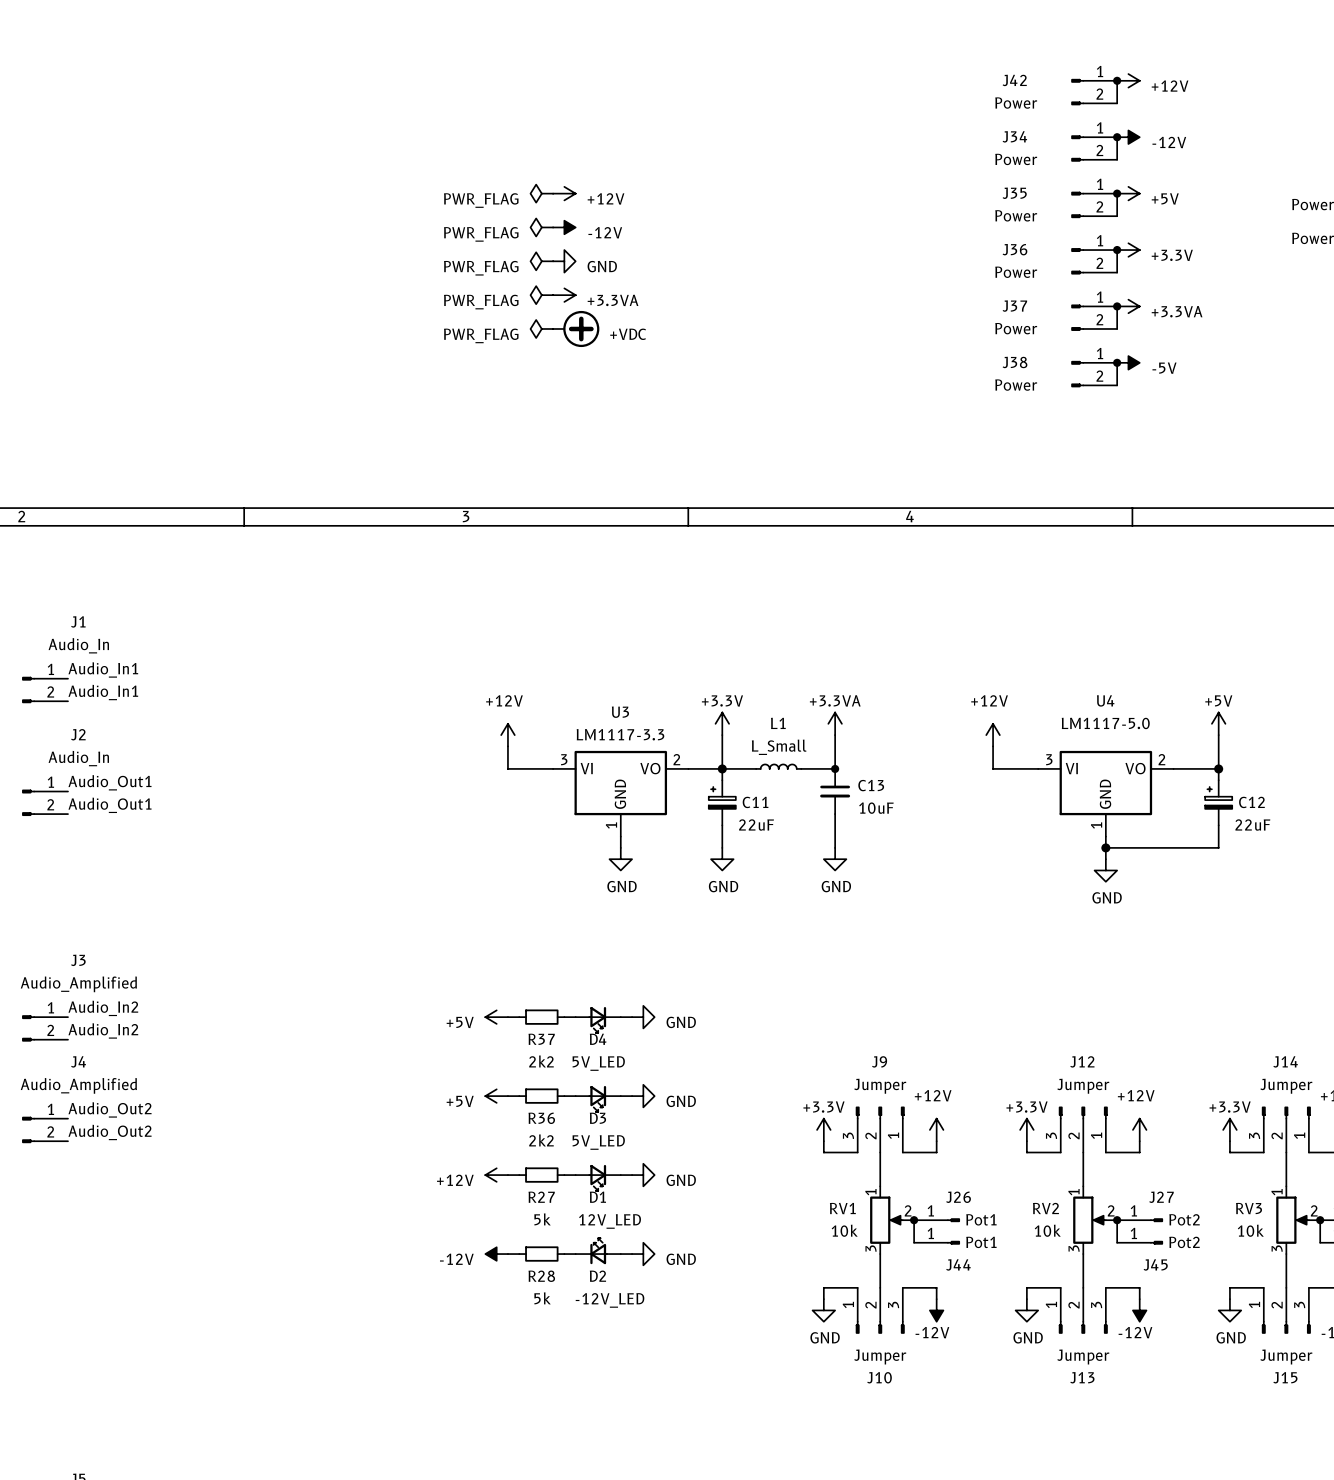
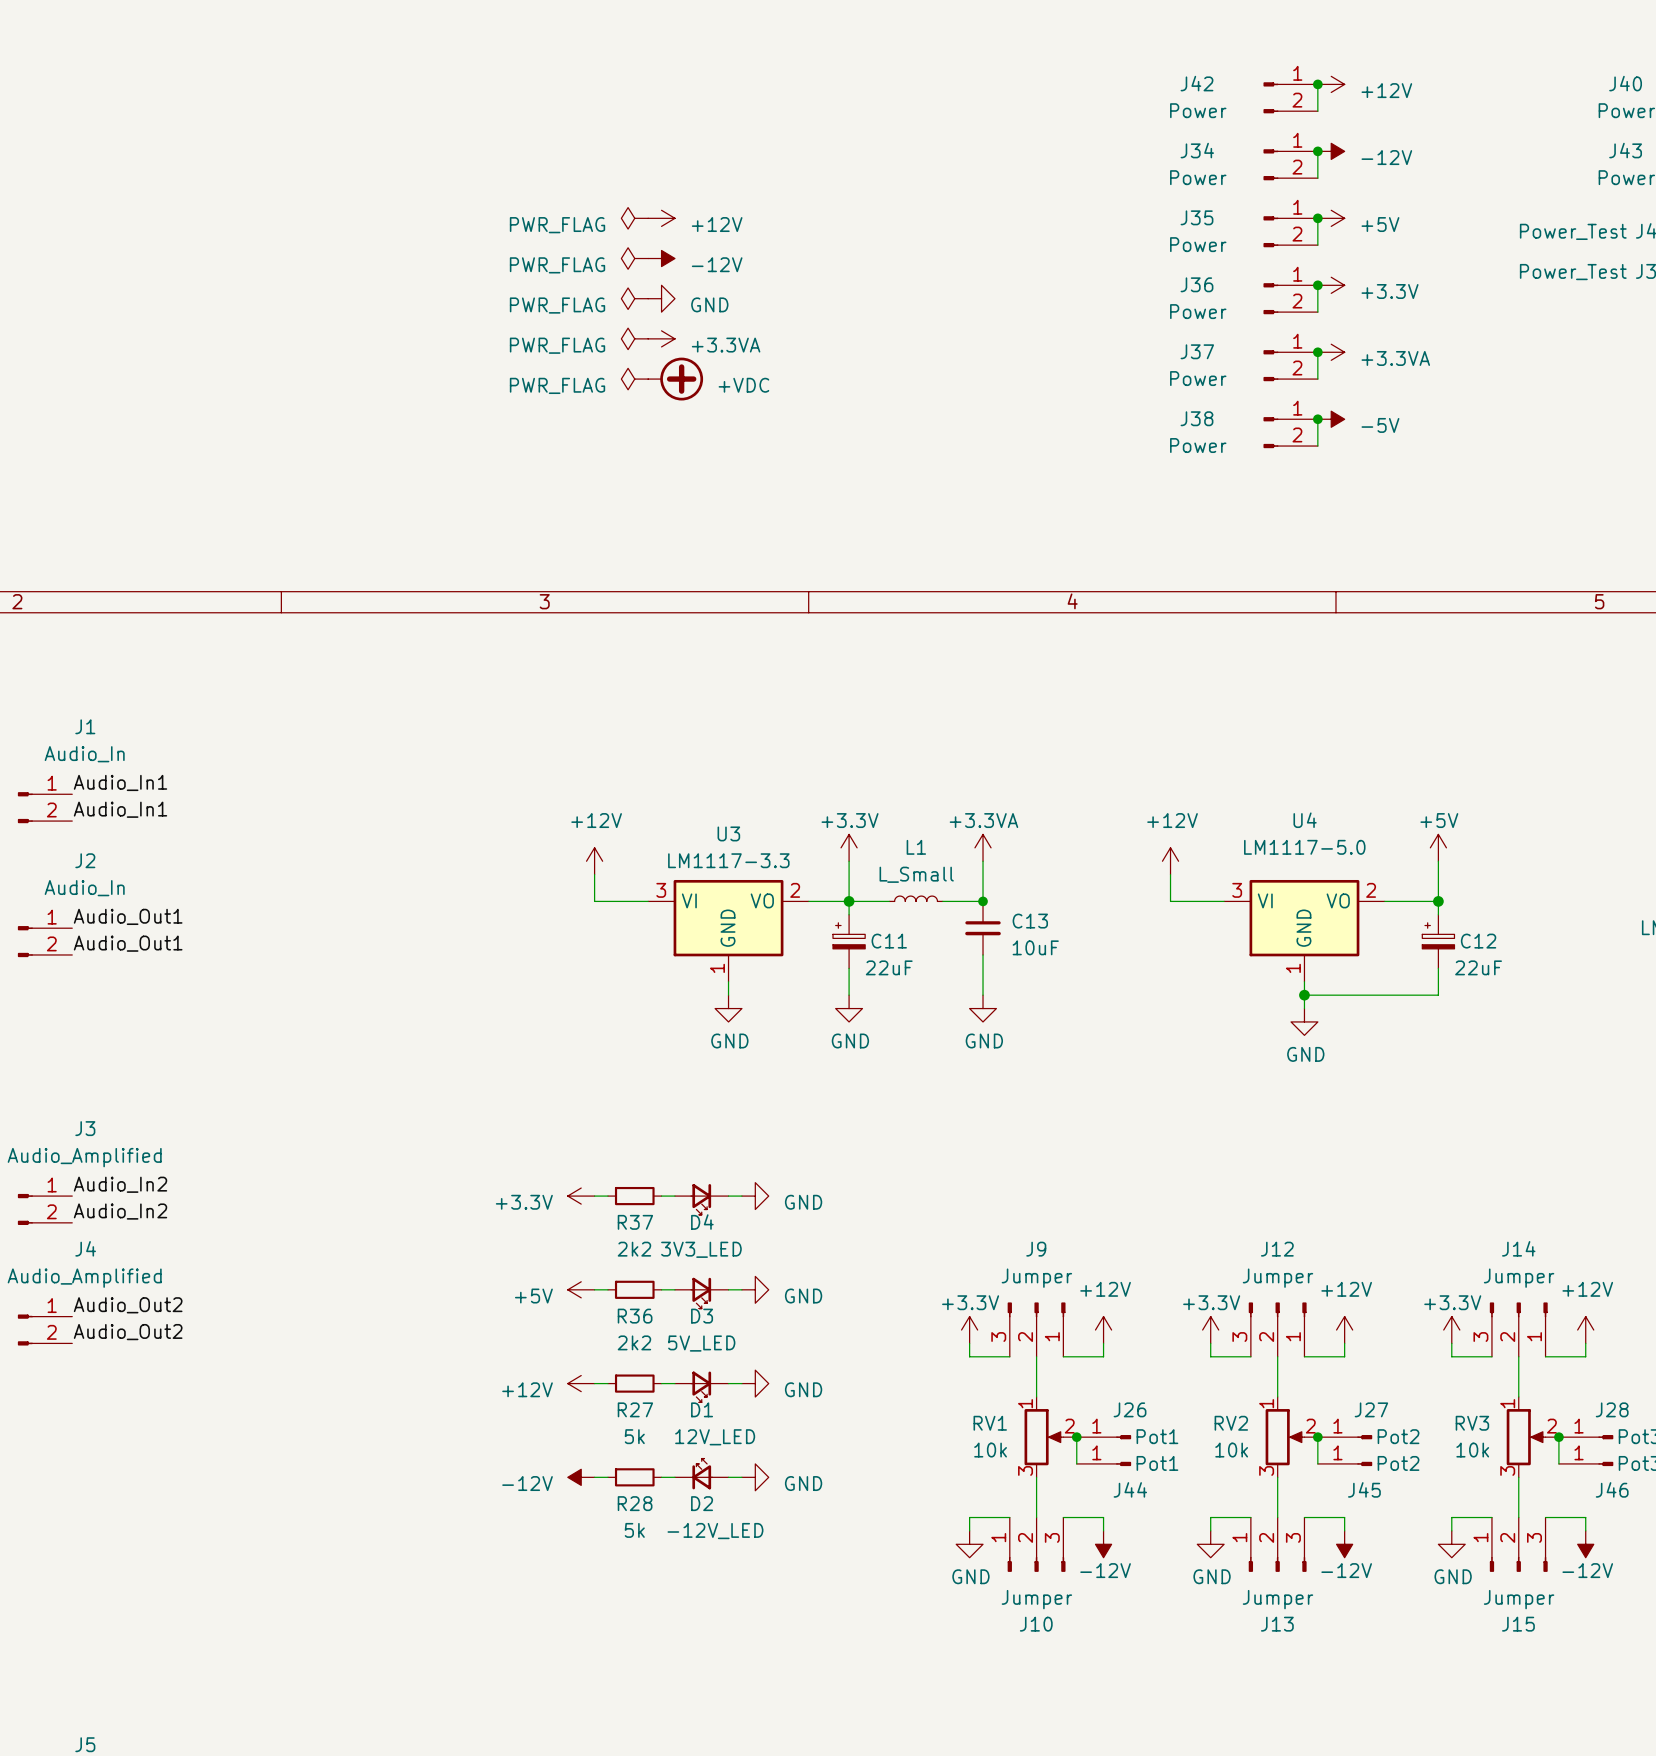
power symbol: +5V (496, 1017) -> +3.3V (581, 1196)
D4 value: 5V_LED (598, 1063) -> 3V3_LED (701, 1249)

